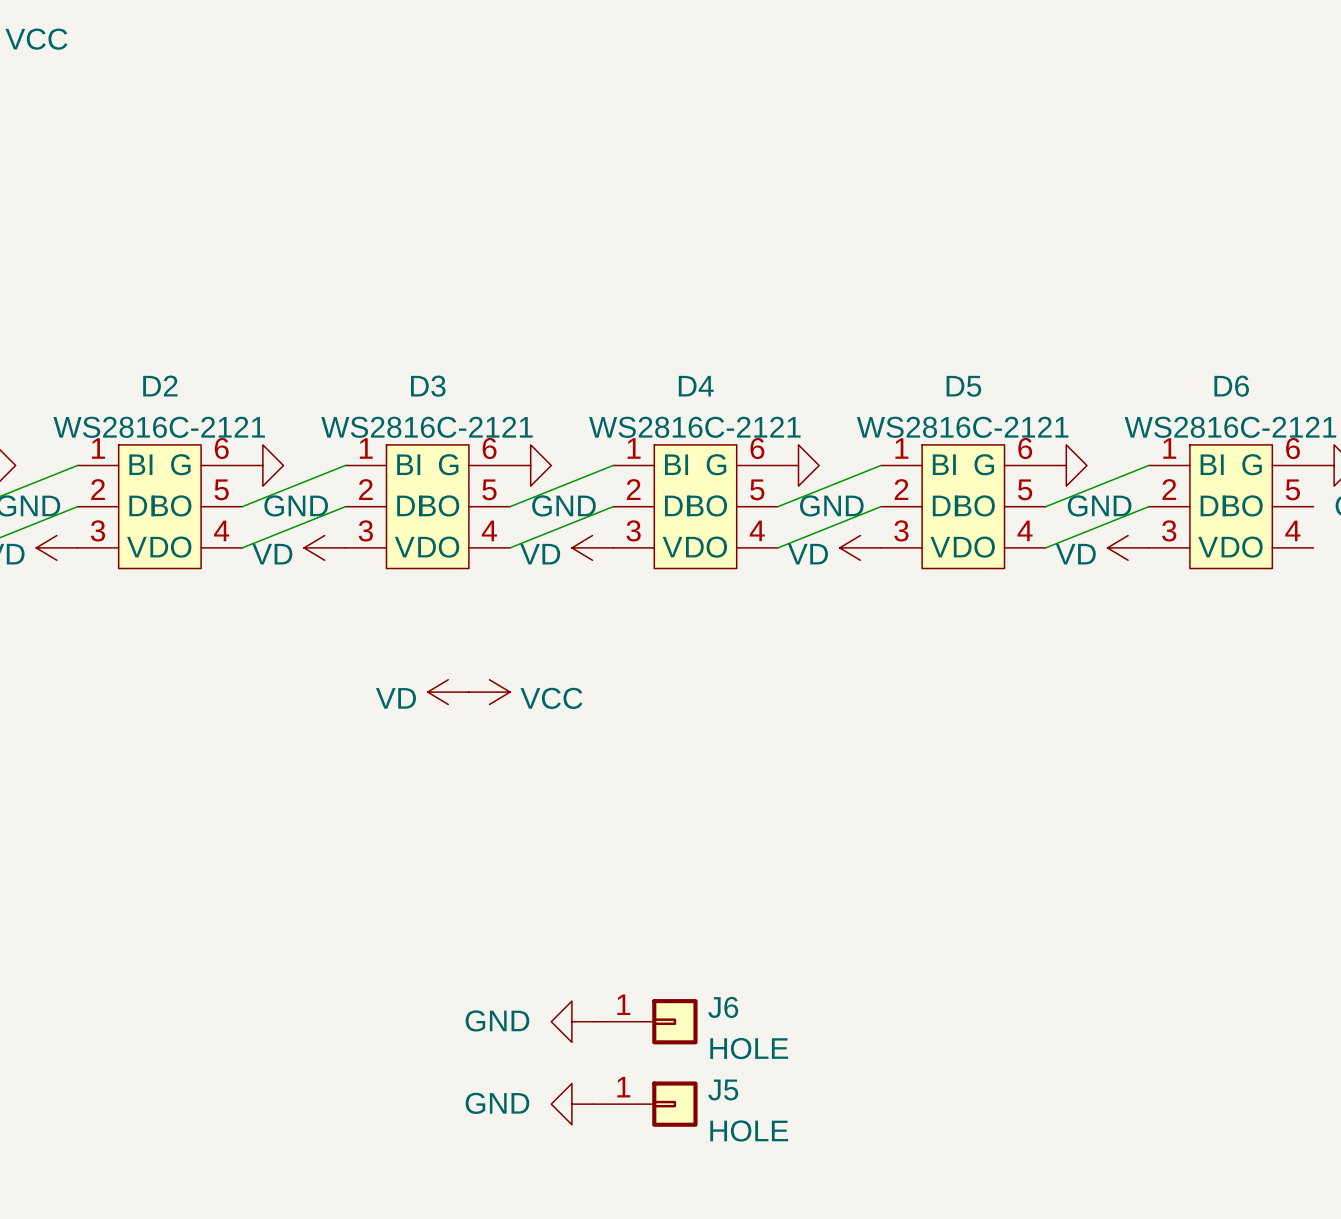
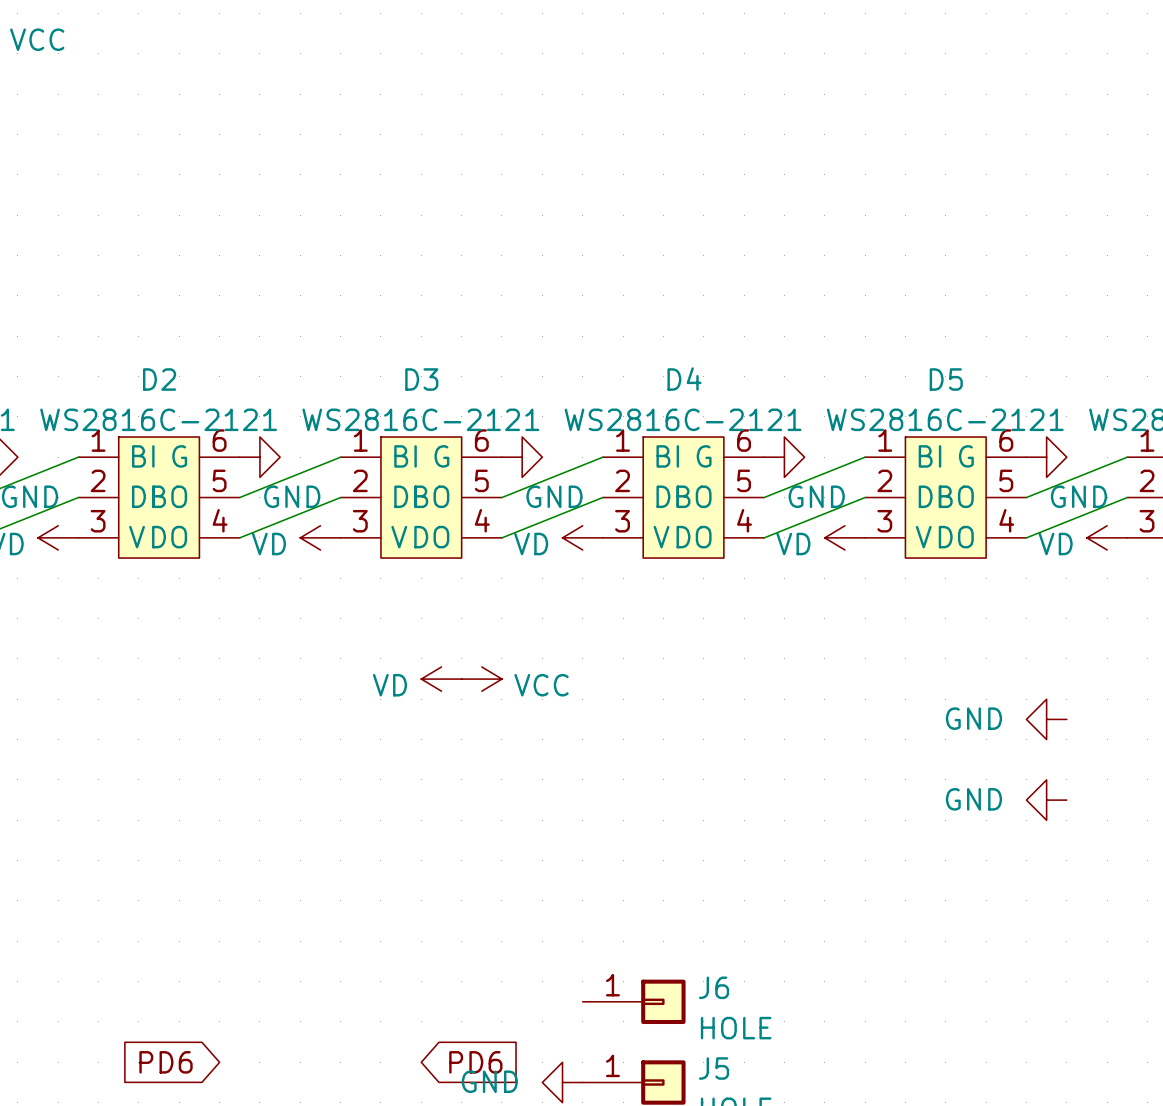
power symbol: none -> GND (1046, 719)
power symbol: none -> GND (1046, 800)
power symbol: GND (571, 1021) -> none
global label: none -> PD6 (166, 1062)
global label: none -> PD6 (475, 1062)

